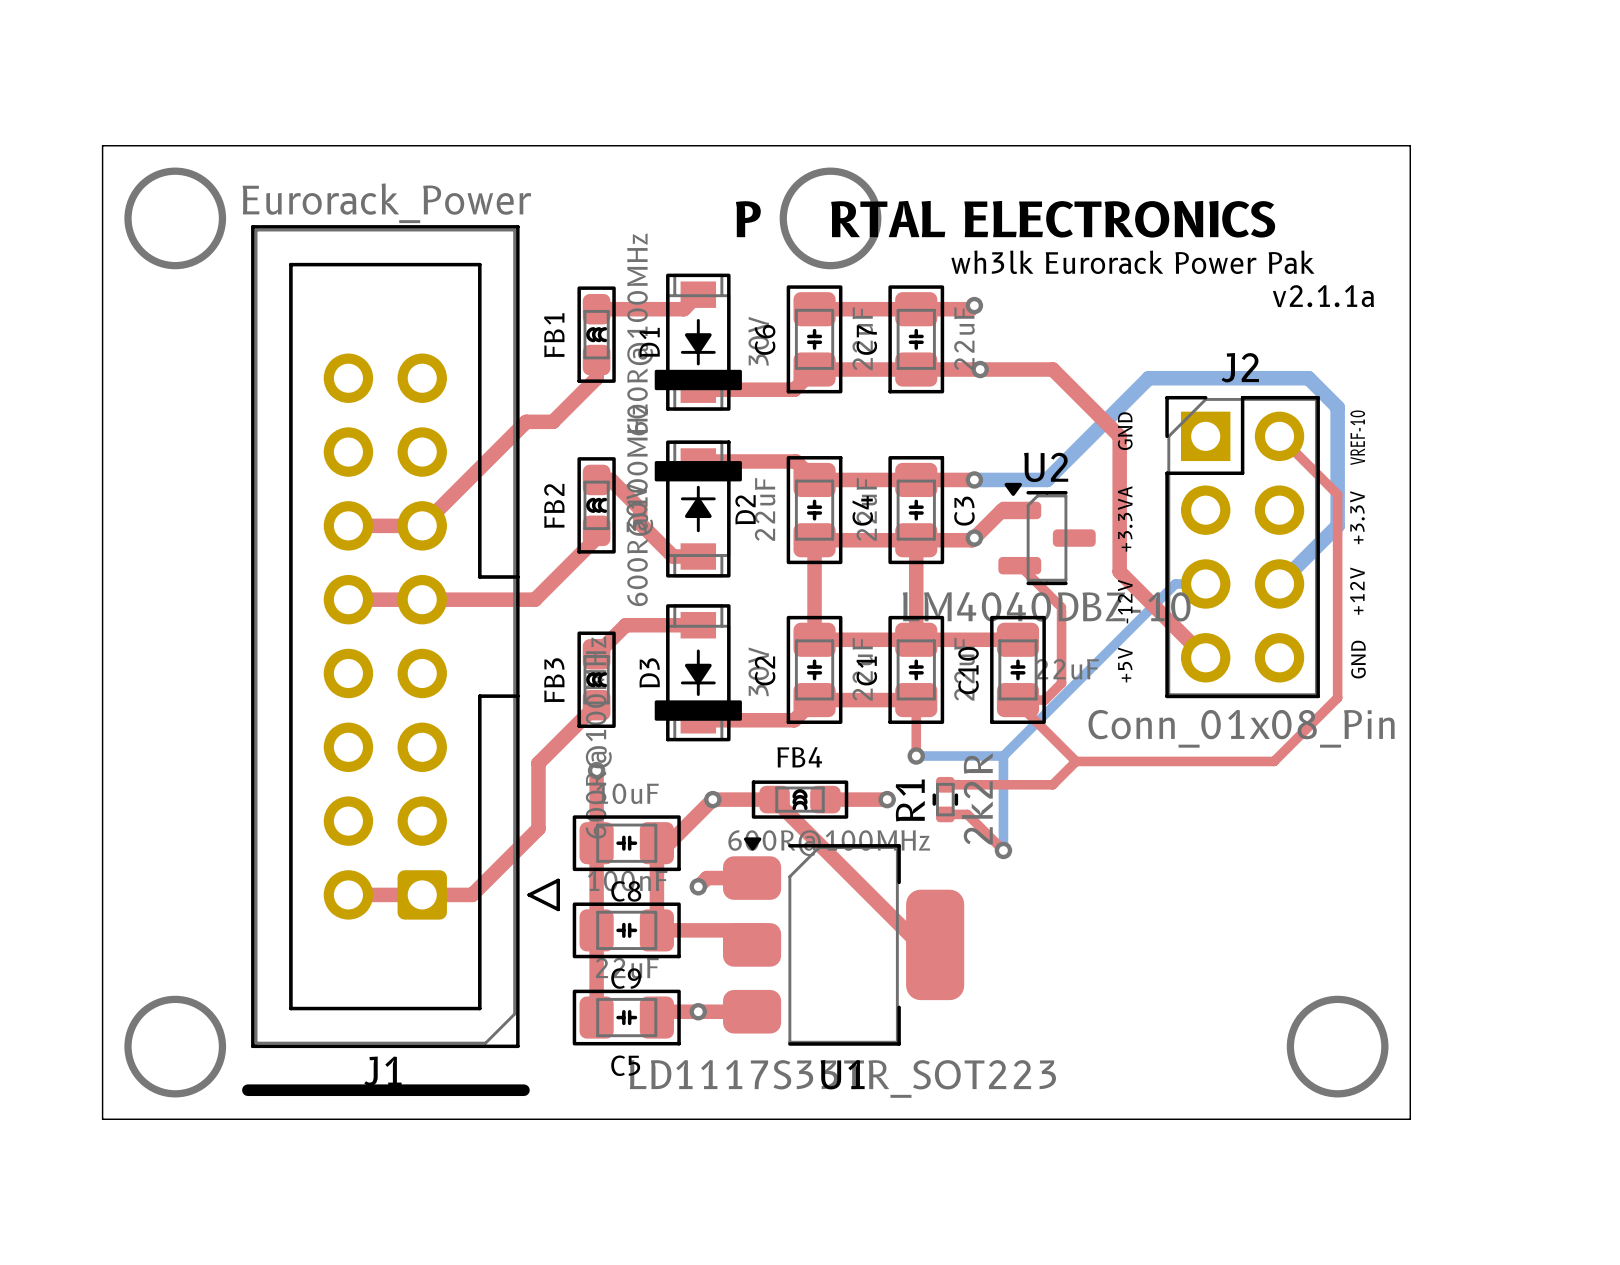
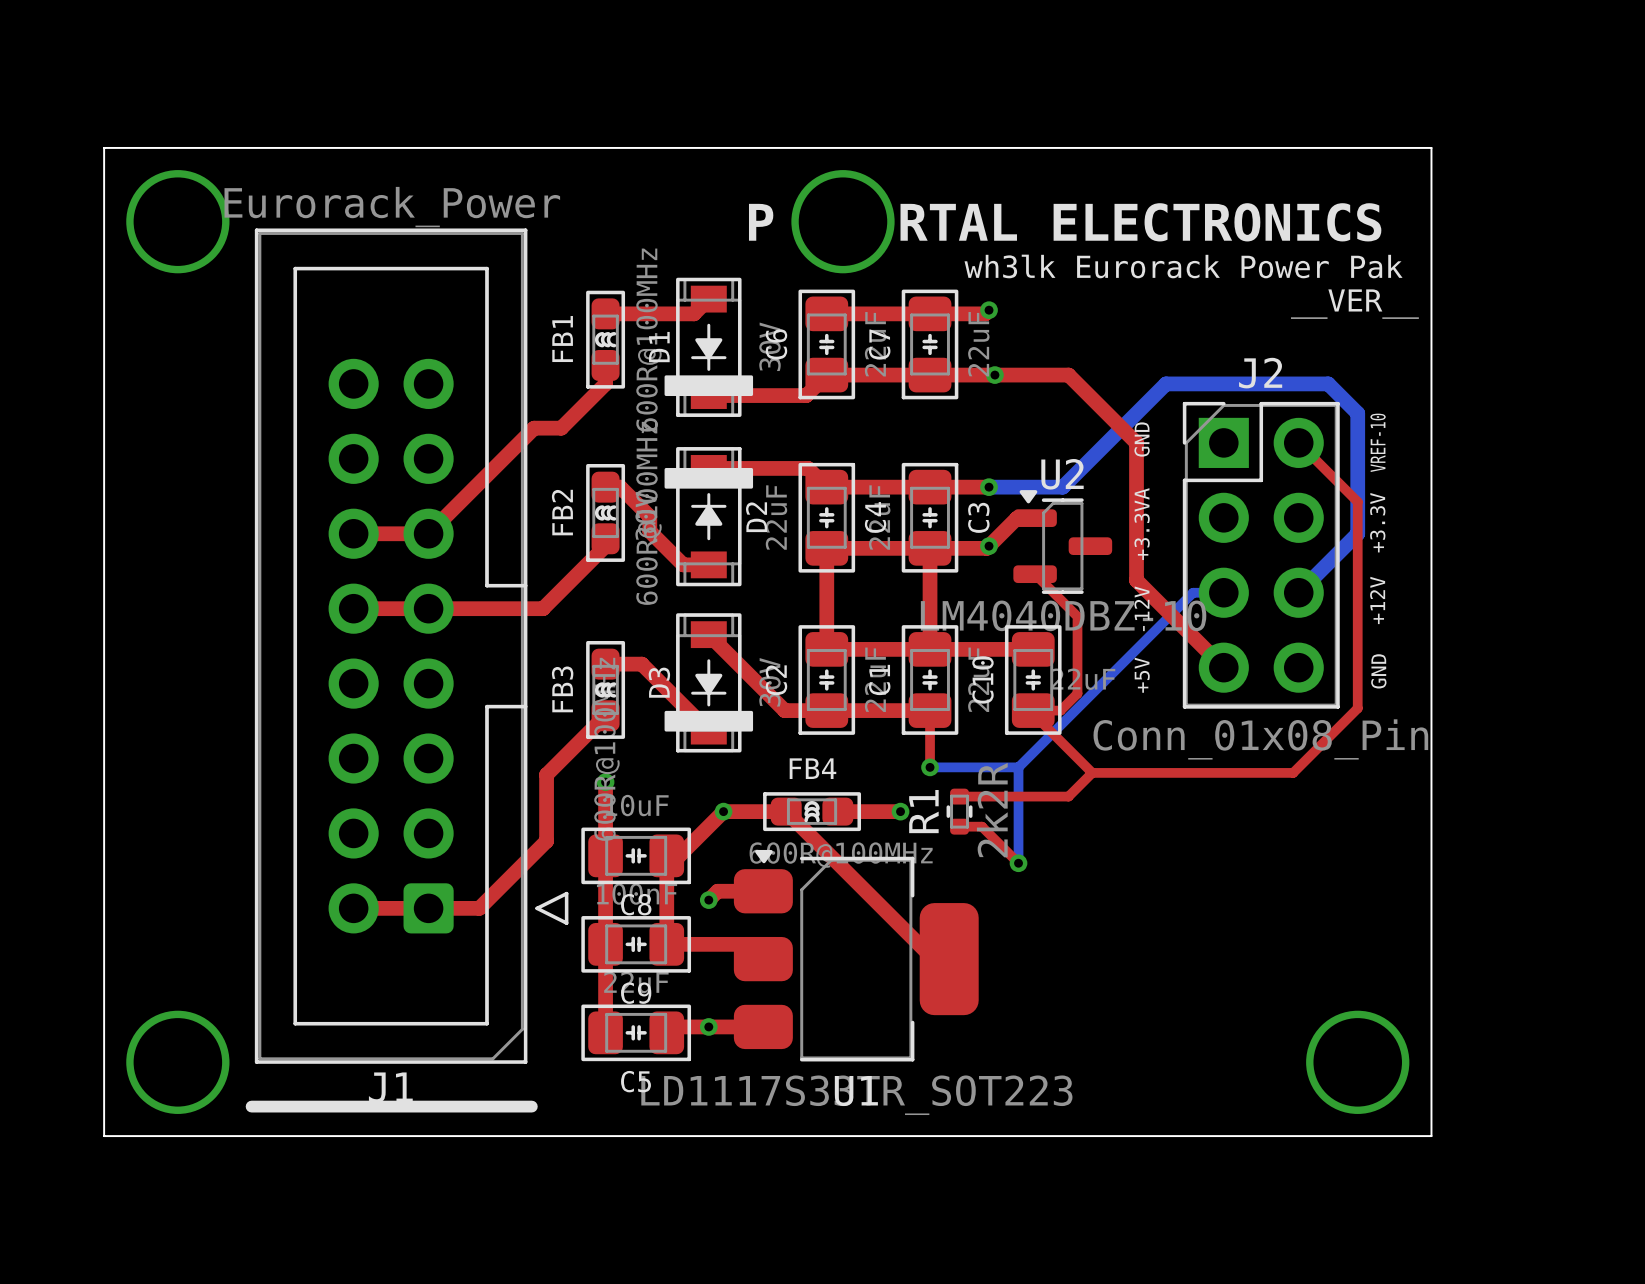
text: v2.1.1a (1323, 296) -> __VER__ (1354, 304)
top track: (698, 625) (625, 625) (596, 654) -> (708, 731) (641, 664) (605, 664)
top track: (814, 700) (794, 720) (698, 720) -> (826, 710) (784, 710) (708, 634)

